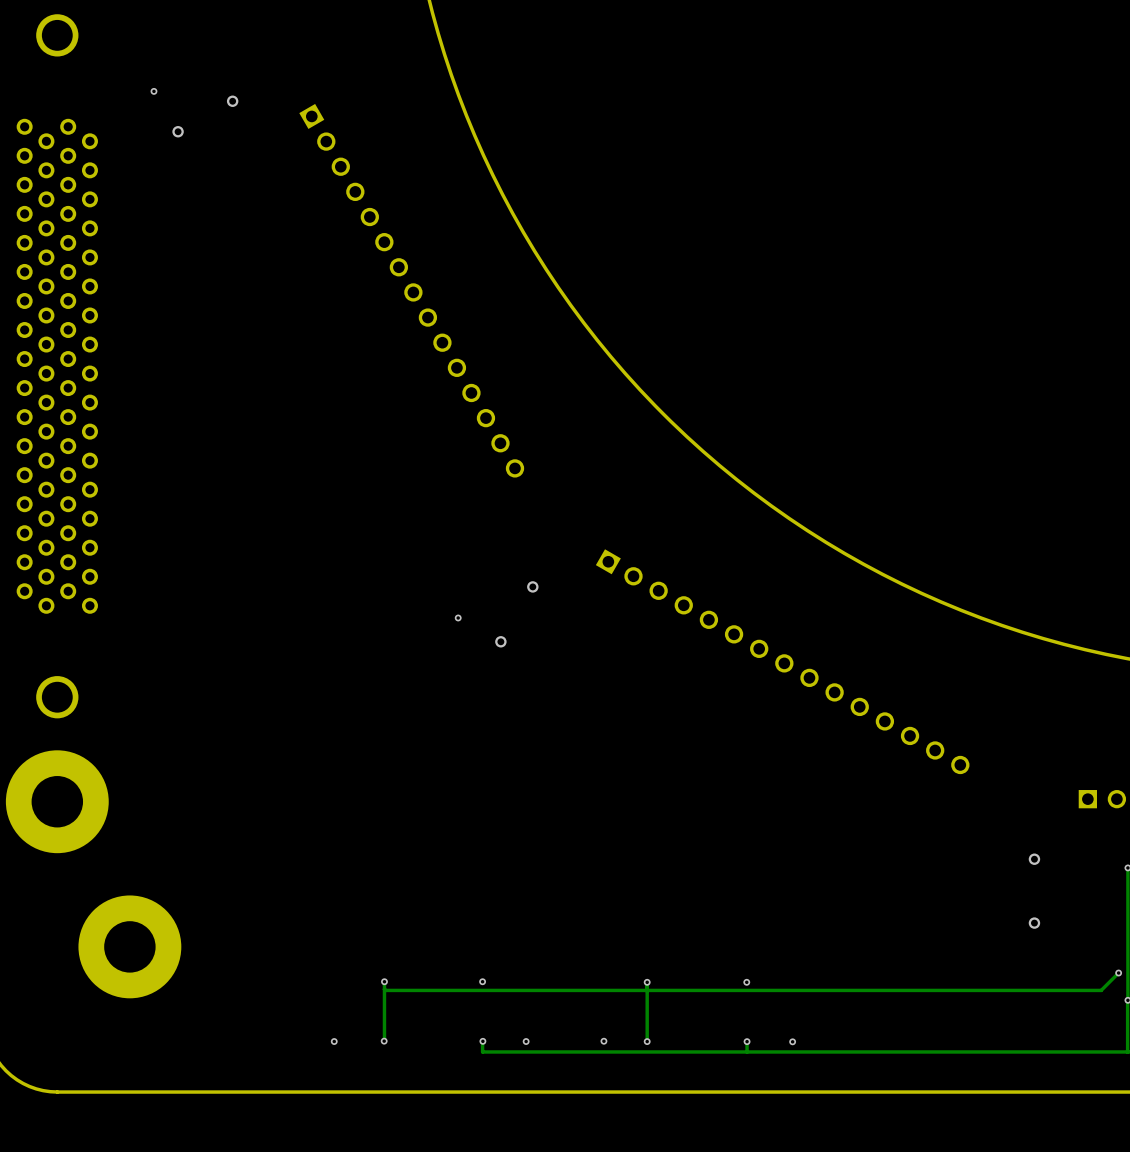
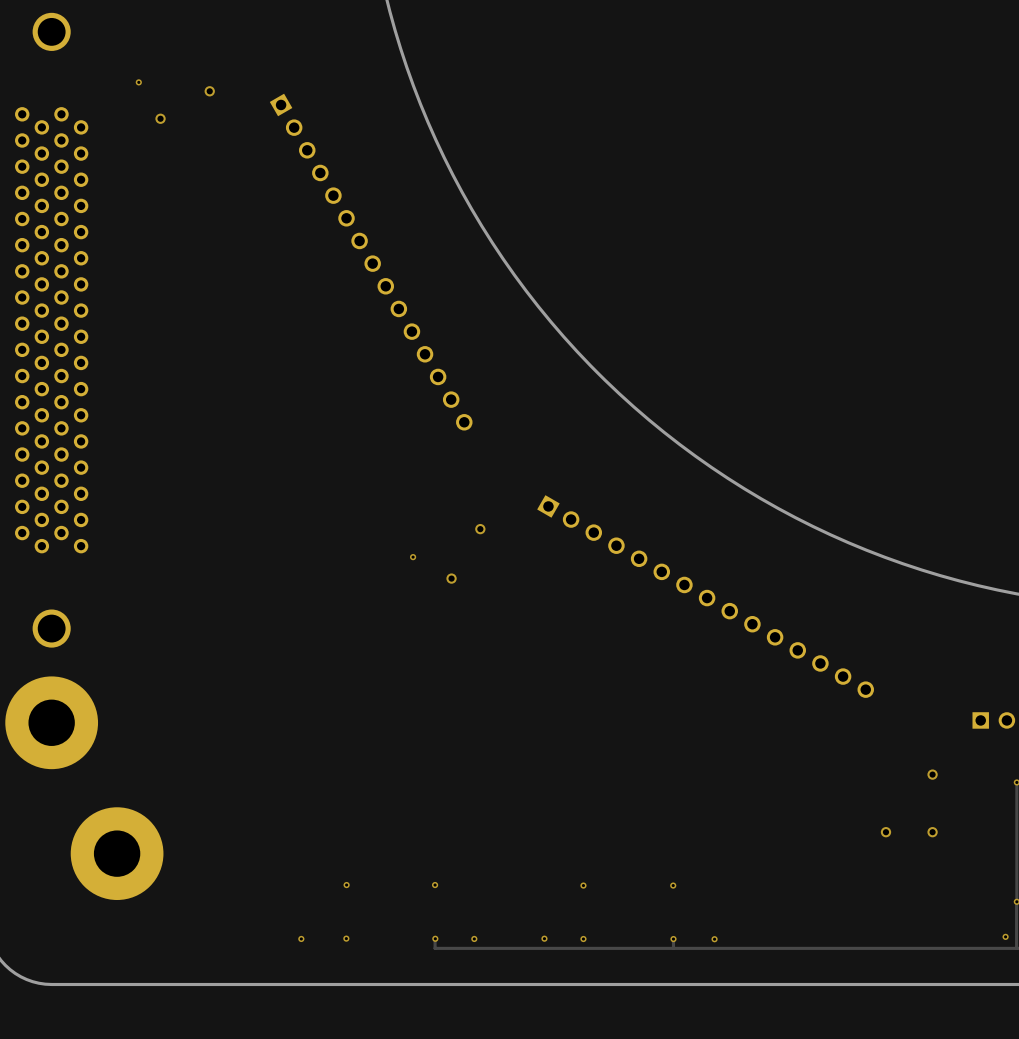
via: none -> (885, 832)
track: (1118, 973) (1101, 990) (384, 989) -> none
via position: (1118, 973) -> (1005, 936)
track: (384, 981) (384, 1040) -> none
track: (647, 982) (647, 1041) -> none

